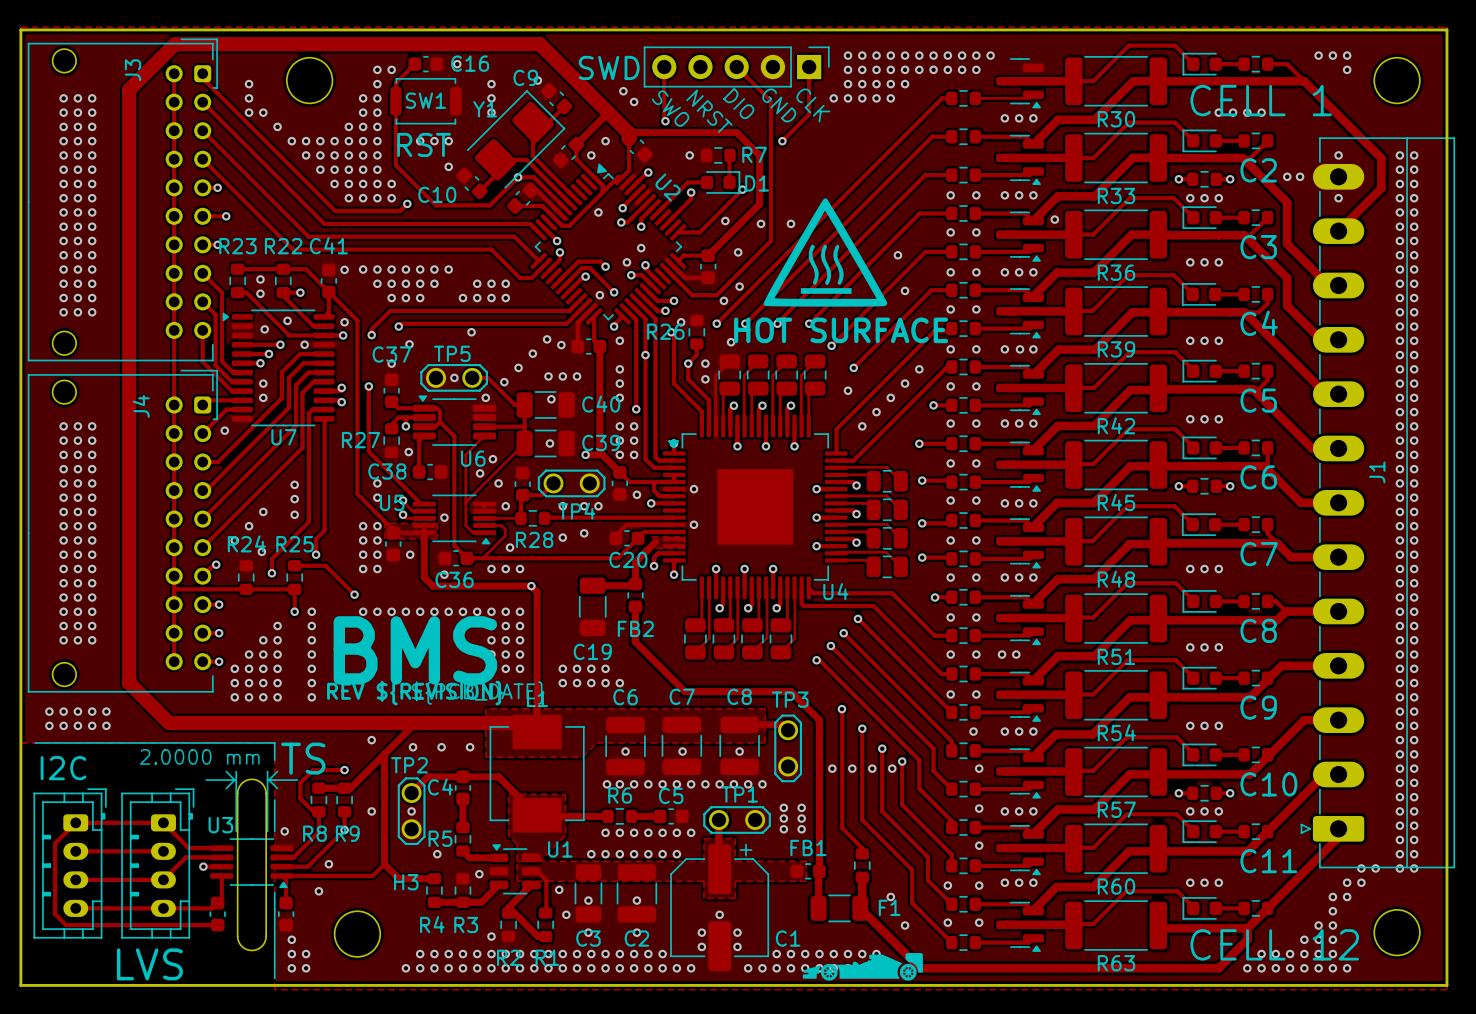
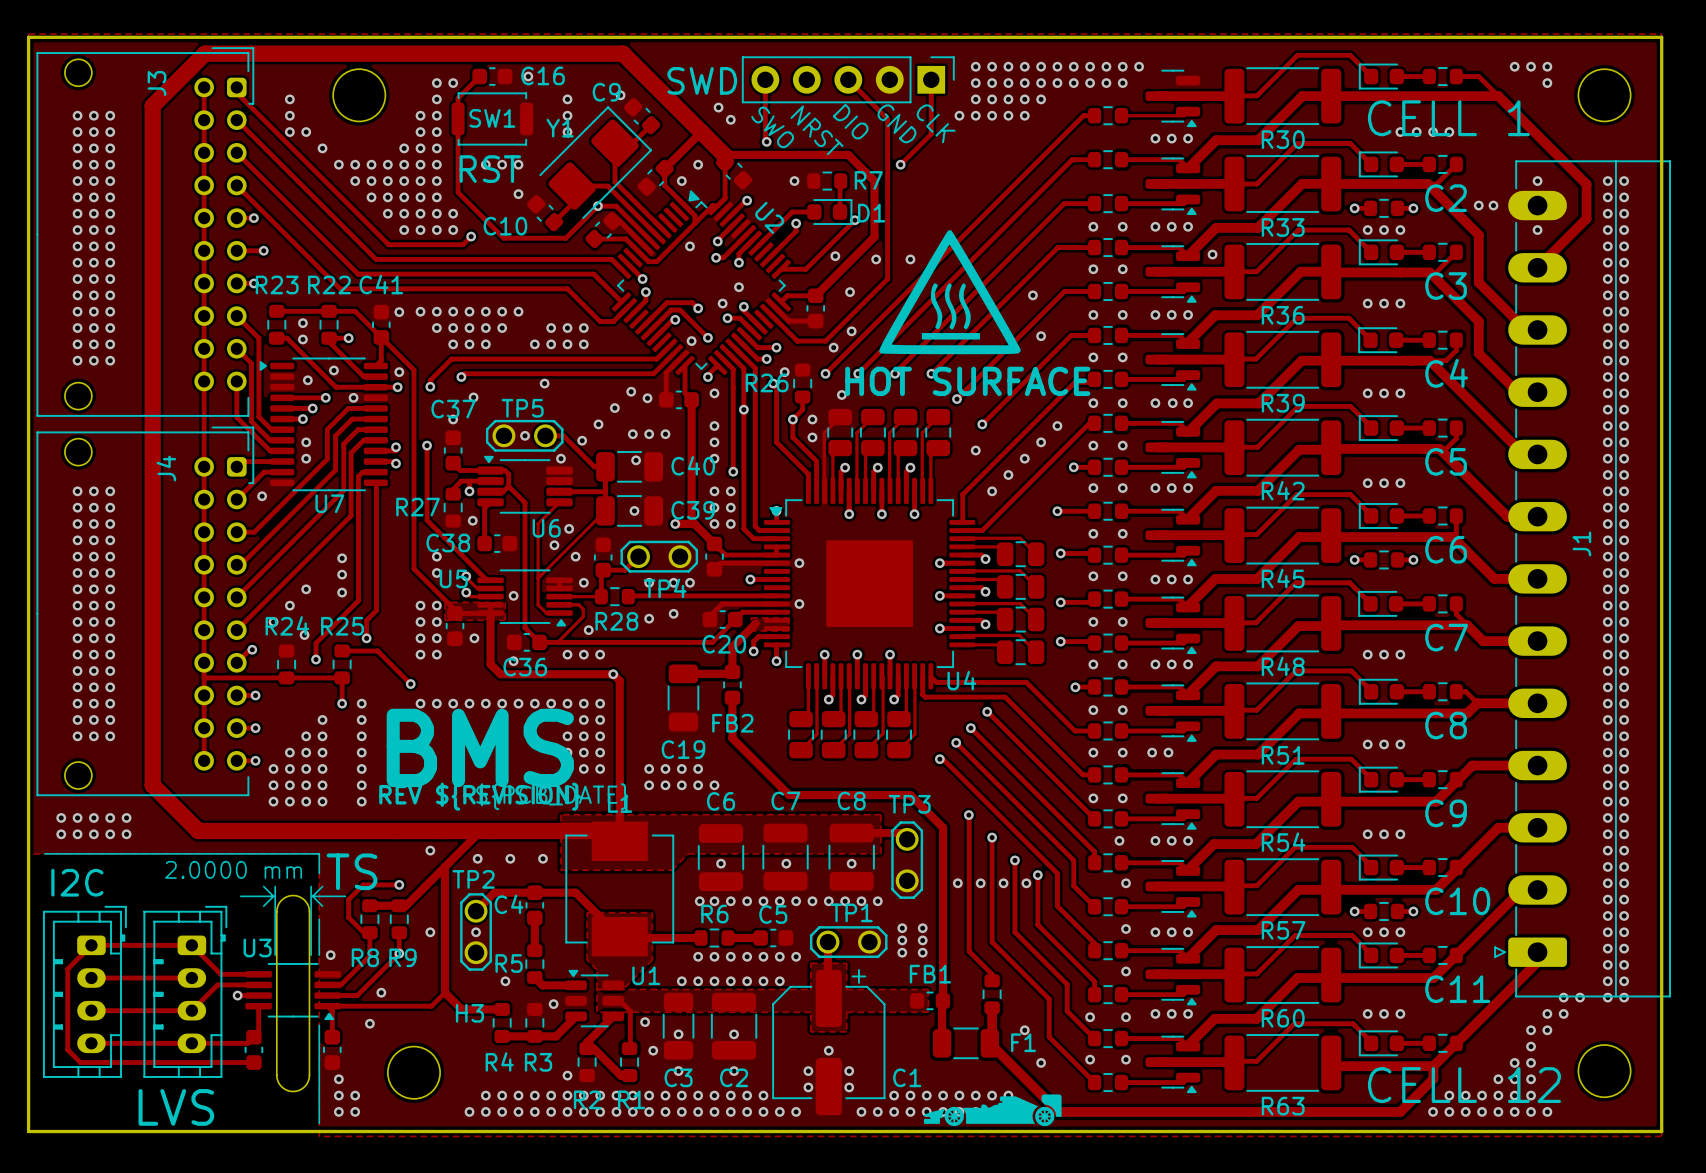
track: (654, 482) (654, 490) (659, 496) (674, 496) -> none
track: none -> (776, 563) (720, 563) (714, 569)
via: (636, 494) -> none

